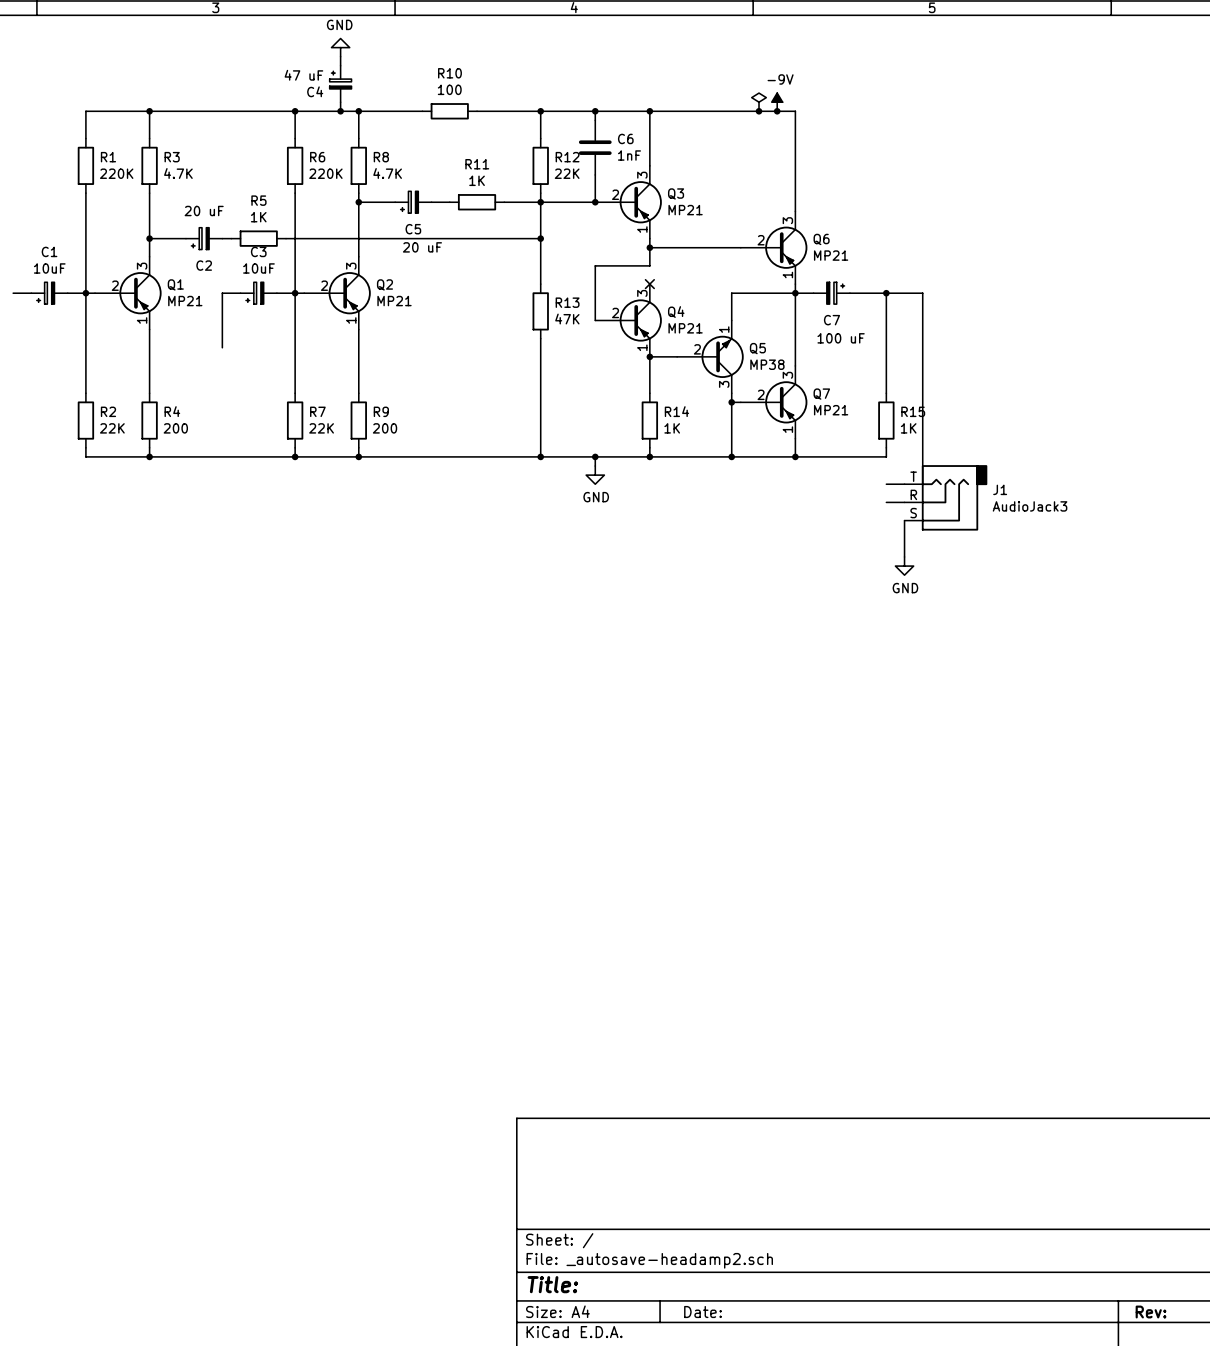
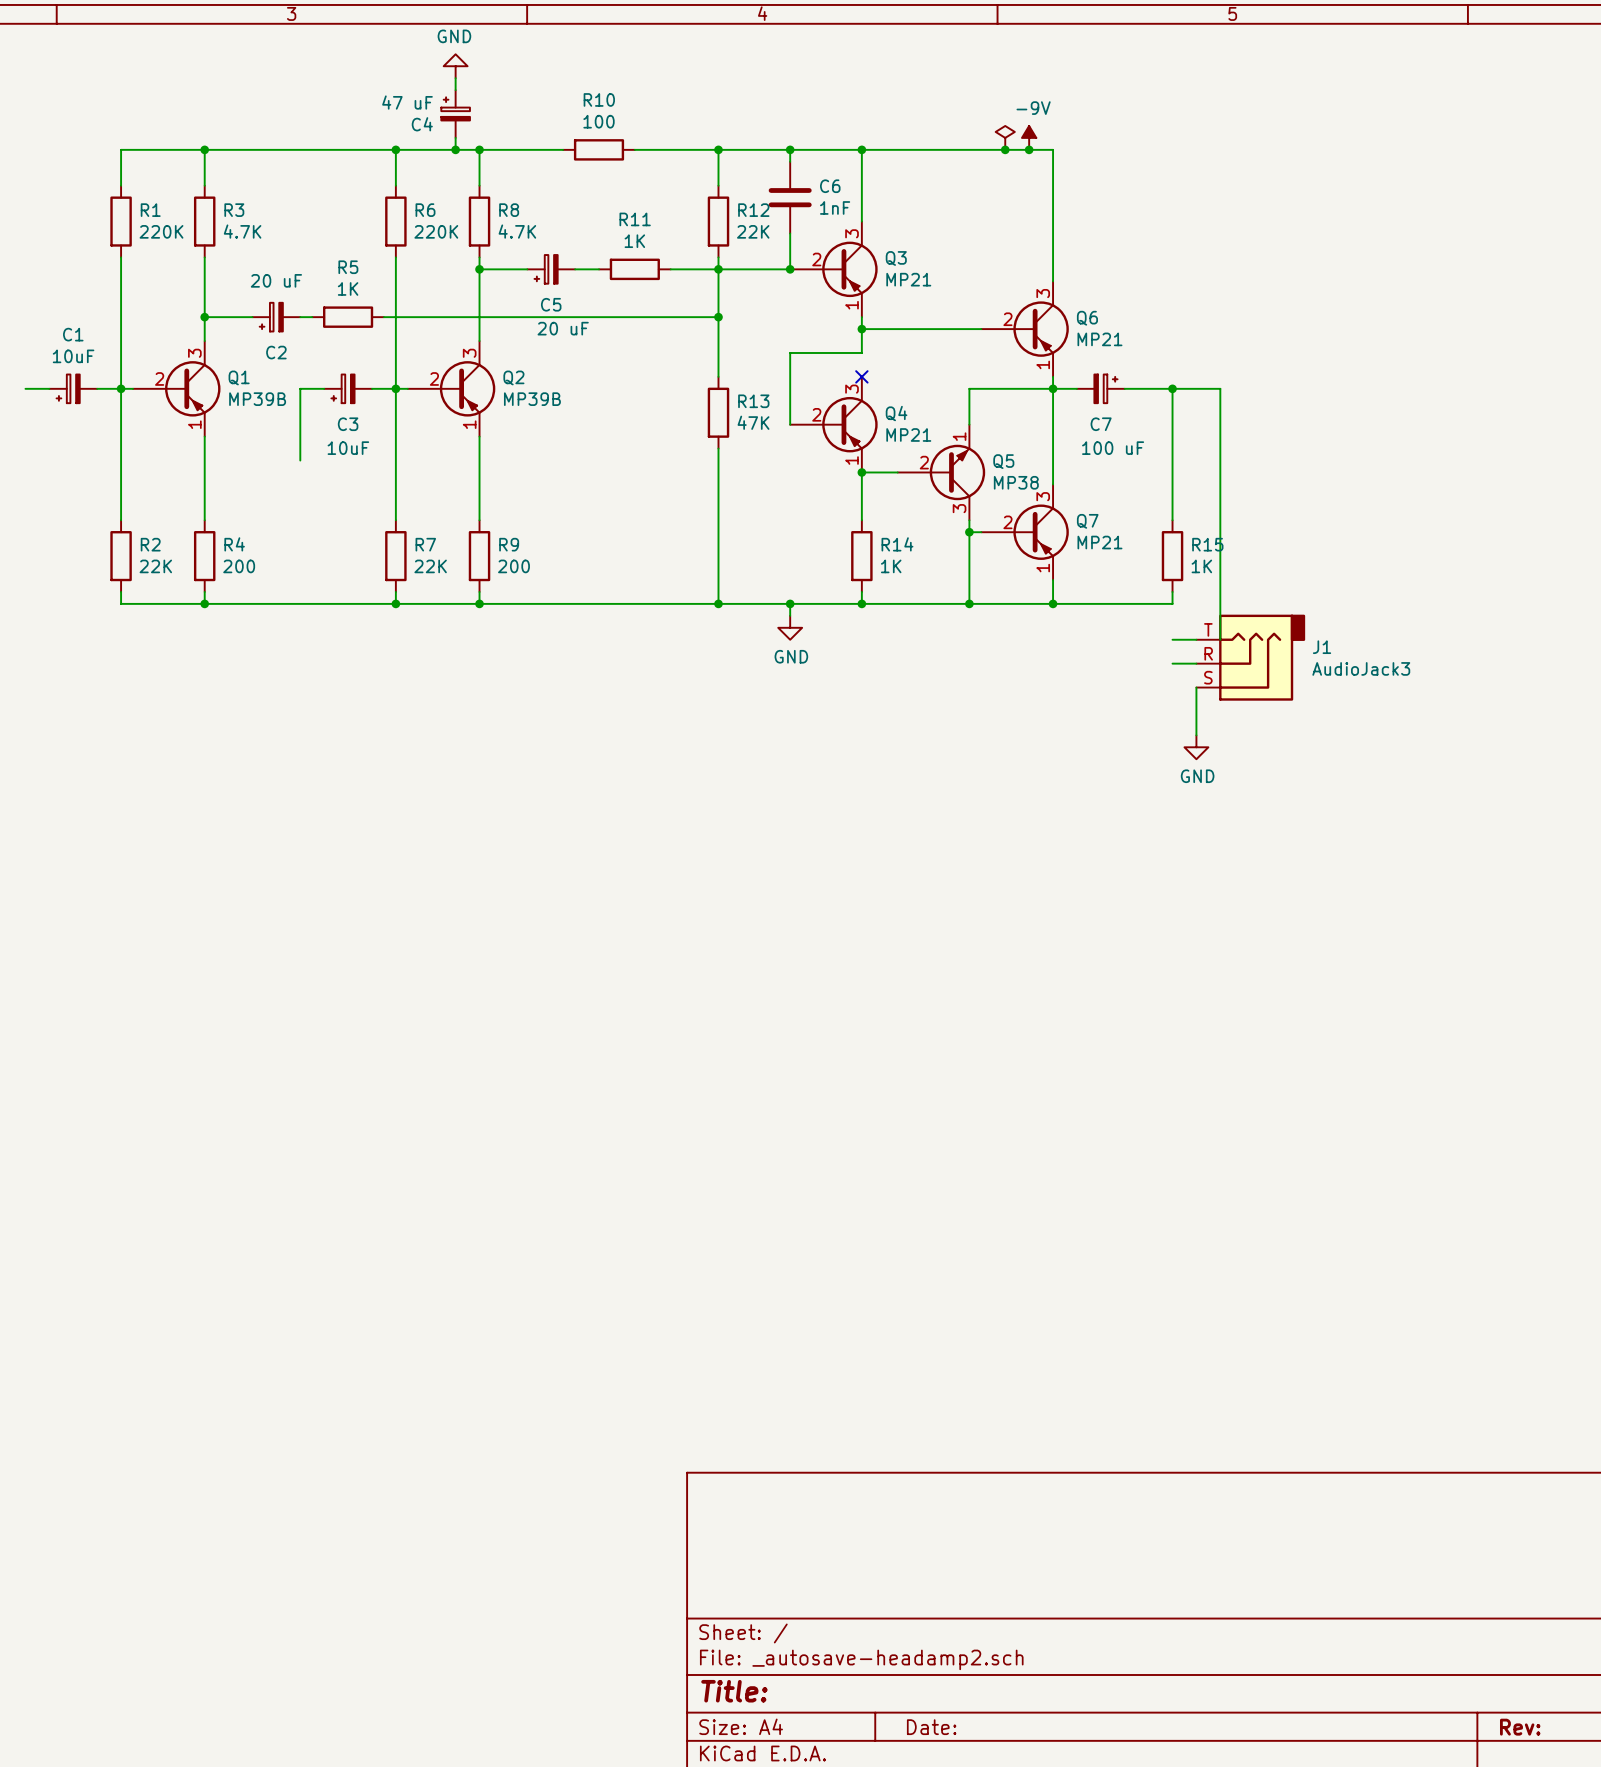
C3 name position: C3 (258, 251) -> C3 (348, 424)
C3 value position: 10uF (258, 268) -> 10uF (348, 448)
Q1 value: MP21 (185, 301) -> MP39B (257, 399)
Q2 value: MP21 (394, 301) -> MP39B (532, 399)

